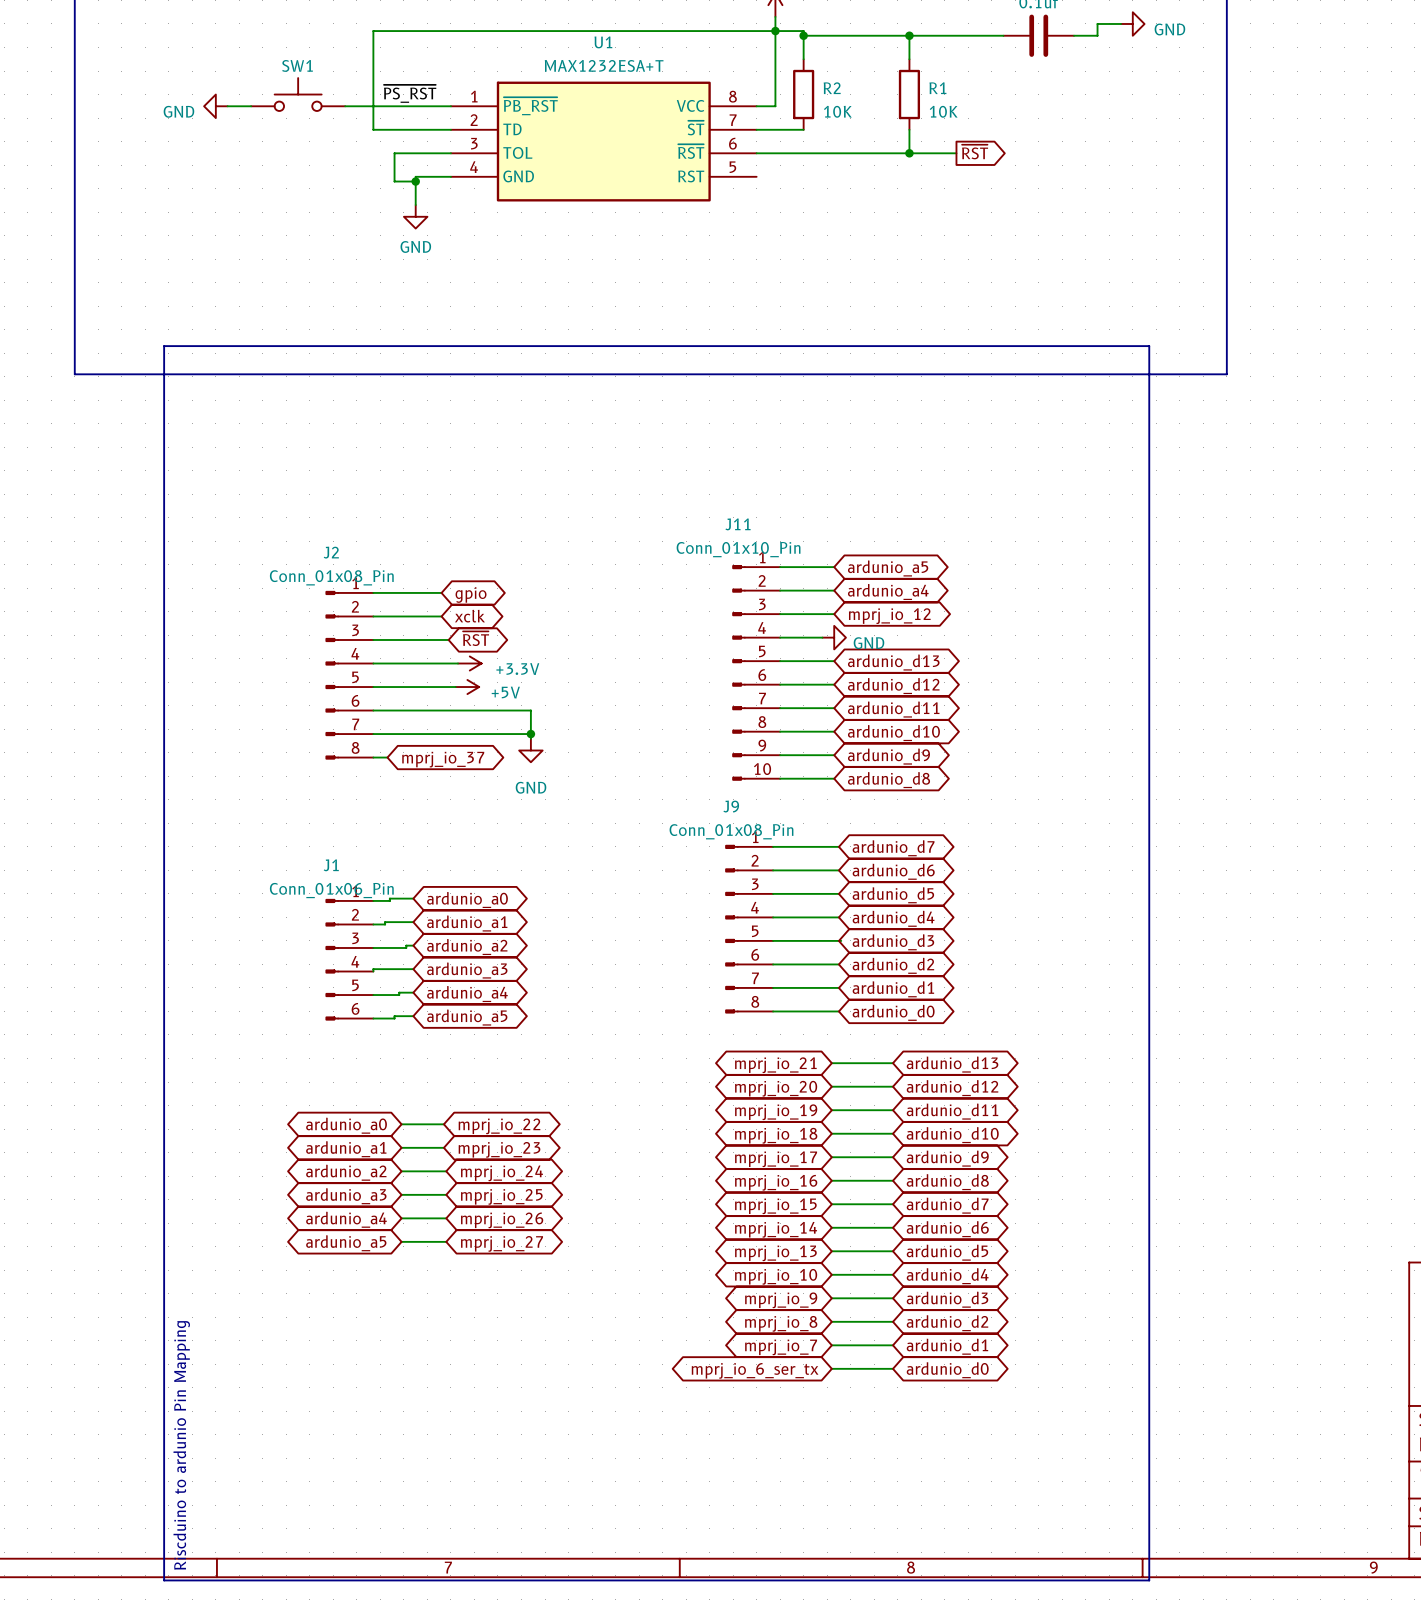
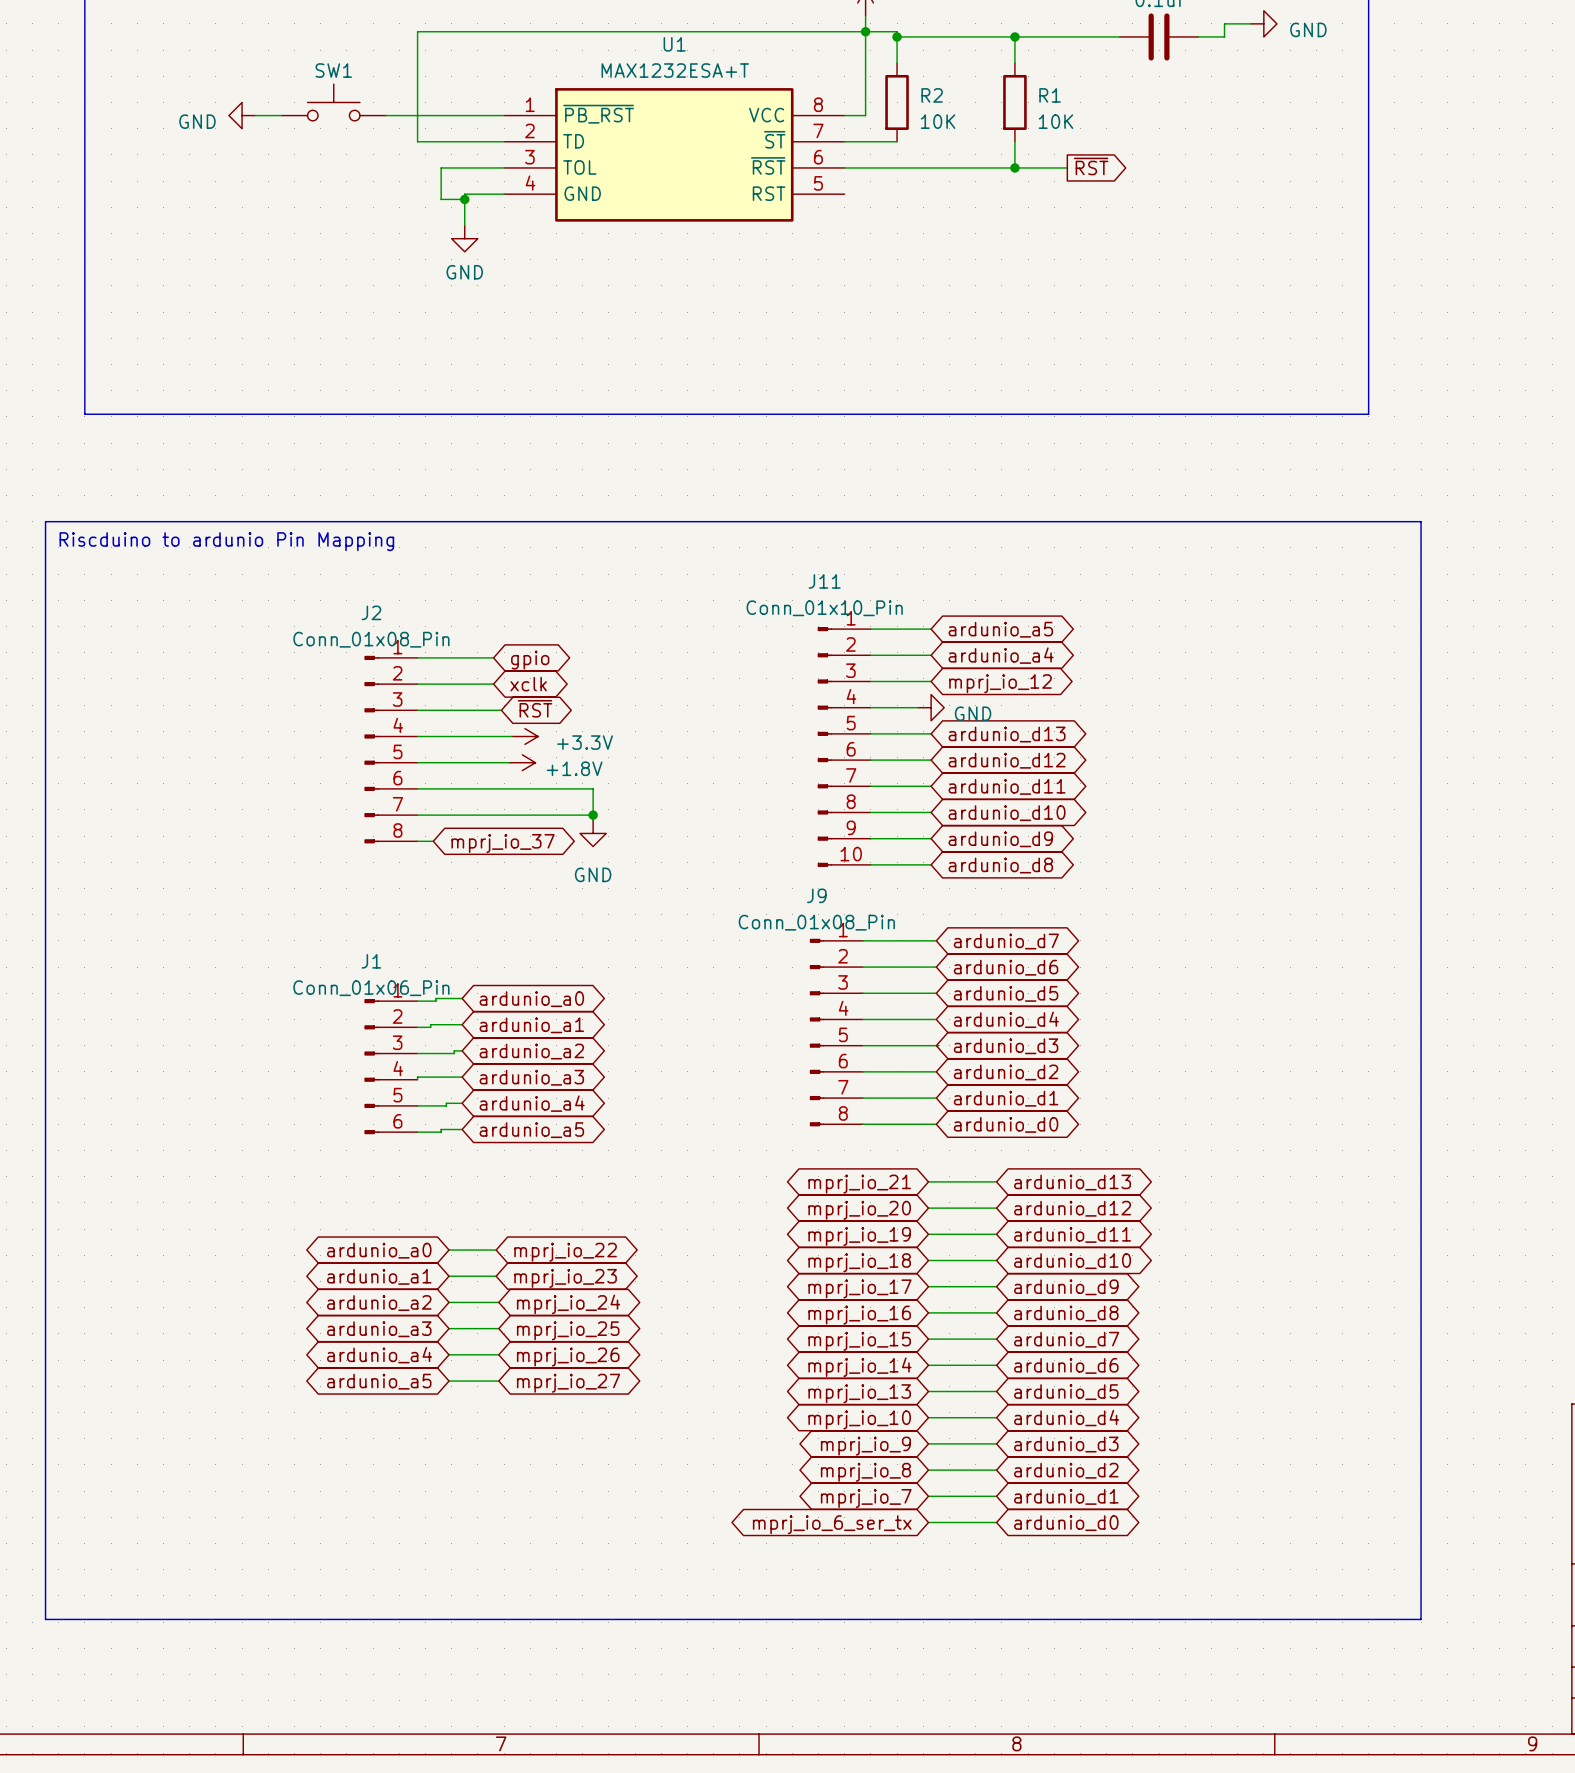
label: ~{PS_RST} (410, 93) -> none
line: (164, 346) (1149, 346) (1149, 1580) (164, 1580) (164, 346) -> (45, 521) (45, 1619) (1421, 1619) (1421, 521) (45, 521)
text: none -> Riscduino to ardunio Pin Mapping (226, 541)
power symbol: +5V (467, 687) -> +1.8V (522, 762)
text: Riscduino to ardunio Pin Mapping (181, 1445) -> none

